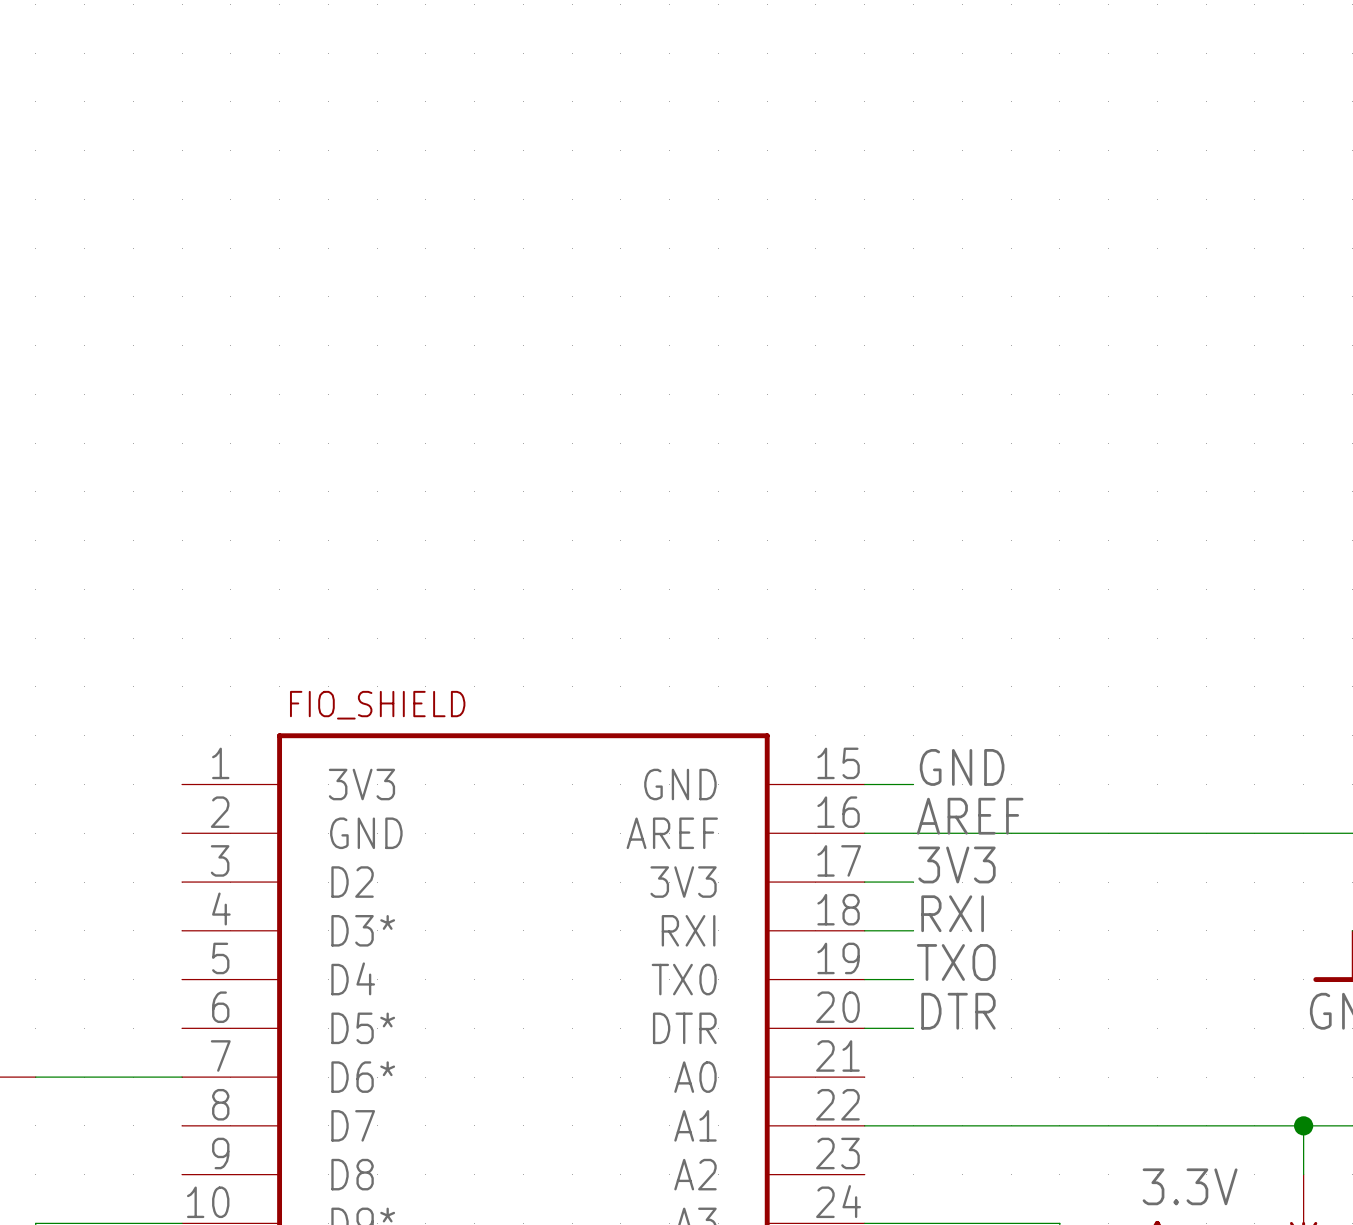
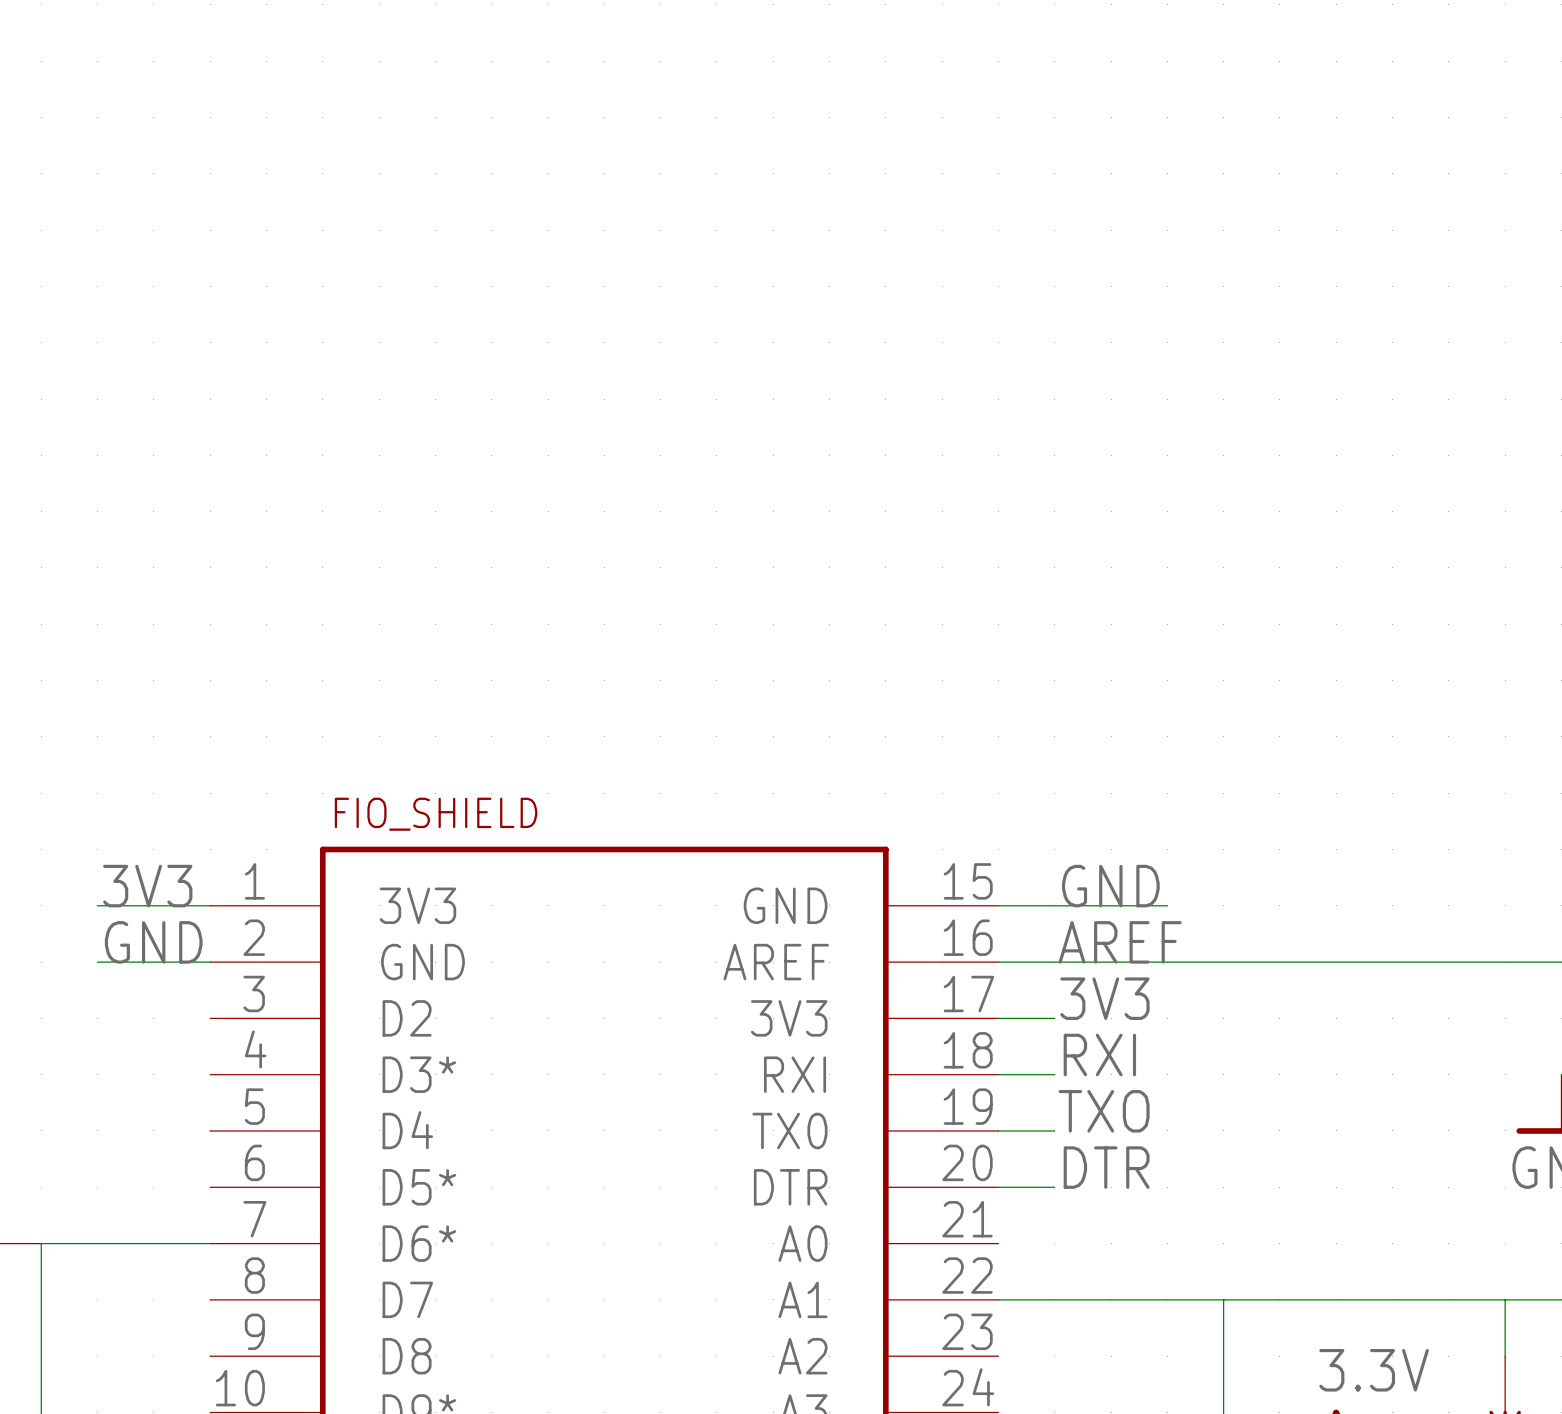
label: none -> 3V3 (147, 886)
wire: none -> (97, 905) (210, 905)
wire: none -> (1054, 905) (1167, 905)
label: none -> GND (153, 942)
wire: none -> (97, 962) (210, 962)
junction: (1303, 1125) -> none
wire: (35, 1223) (182, 1223) -> (41, 1412) (41, 1243)
wire: (864, 1223) (1059, 1223) -> (1223, 1299) (1223, 1412)

